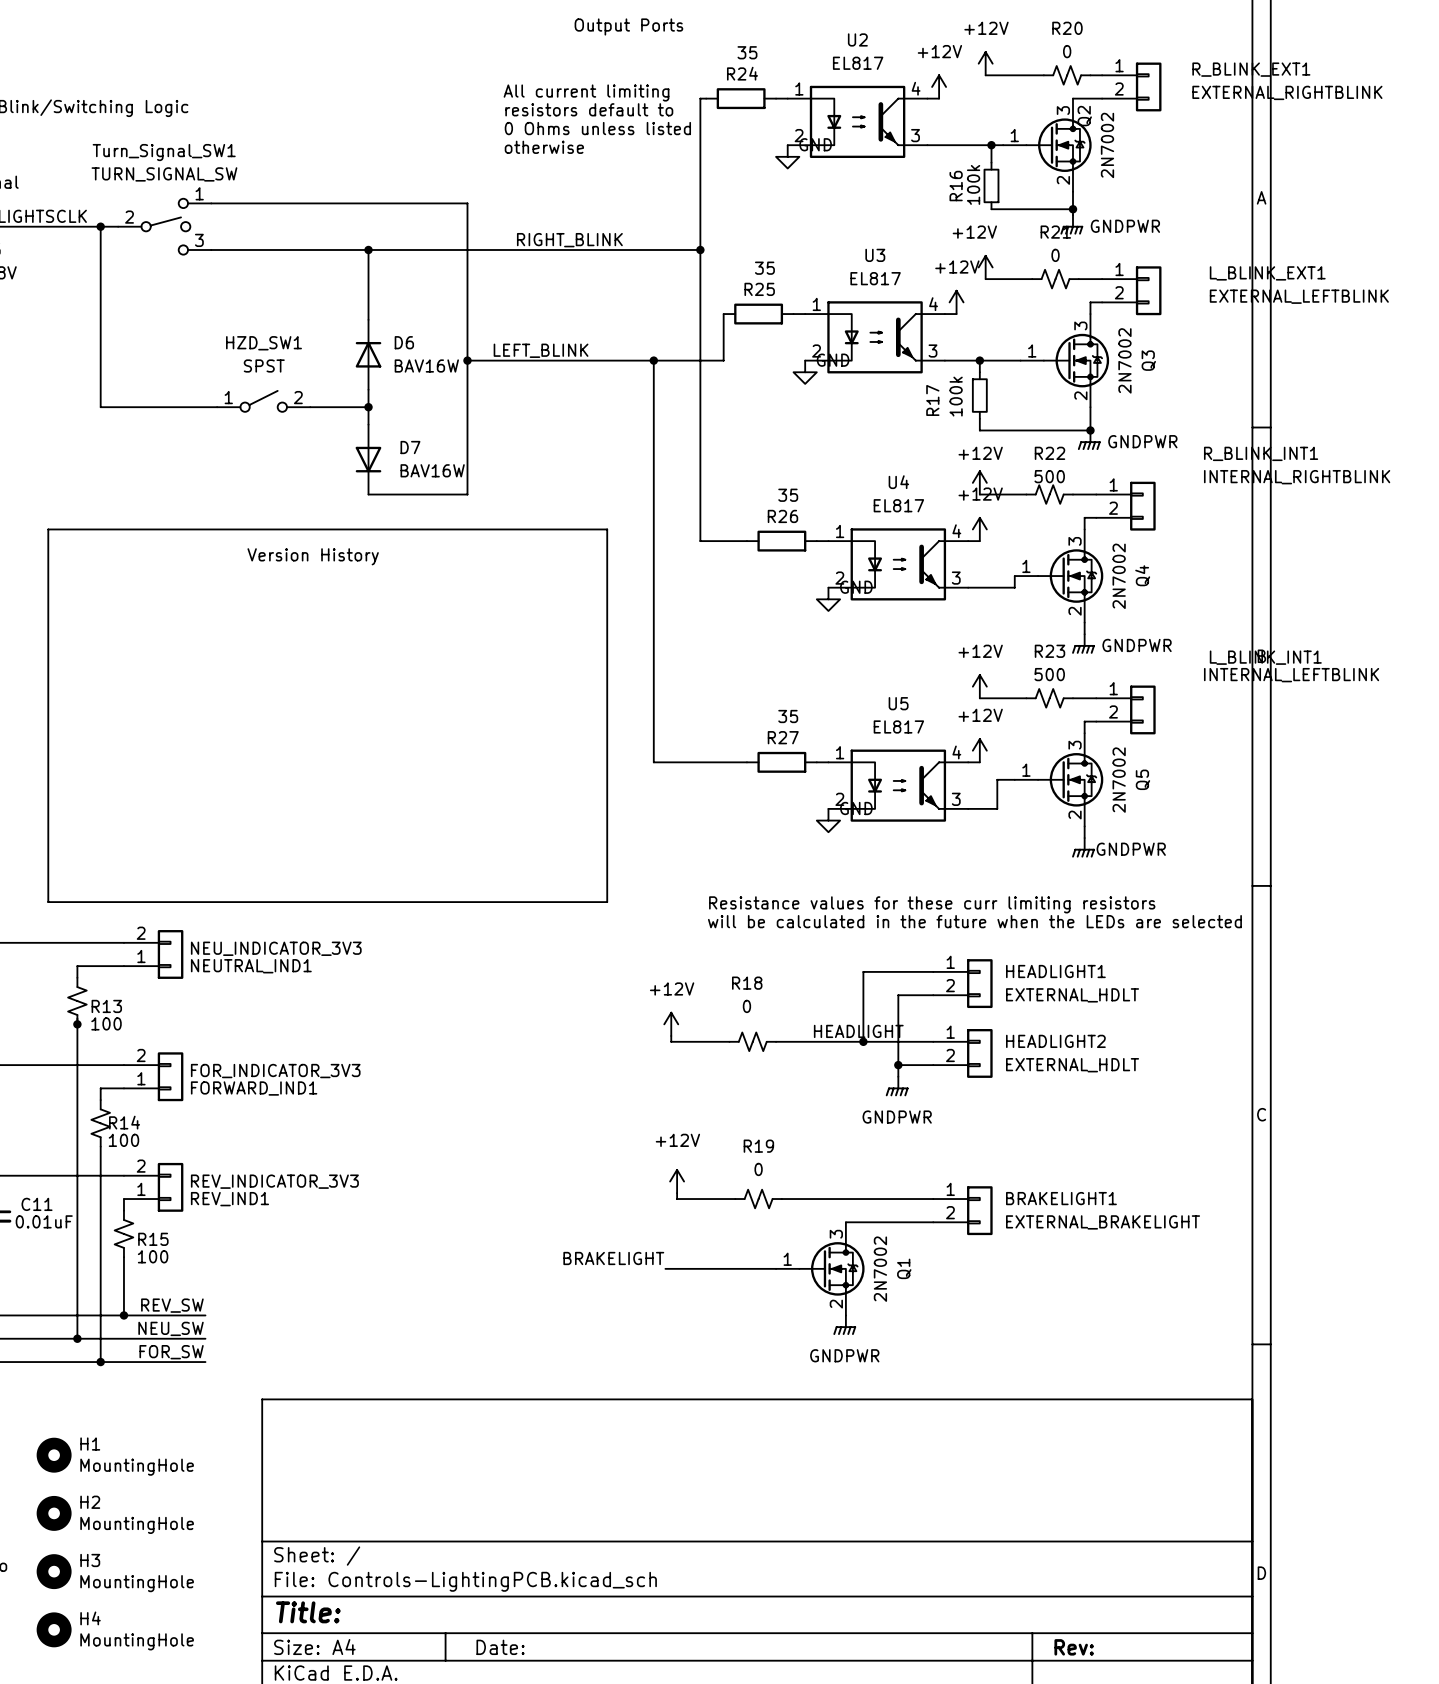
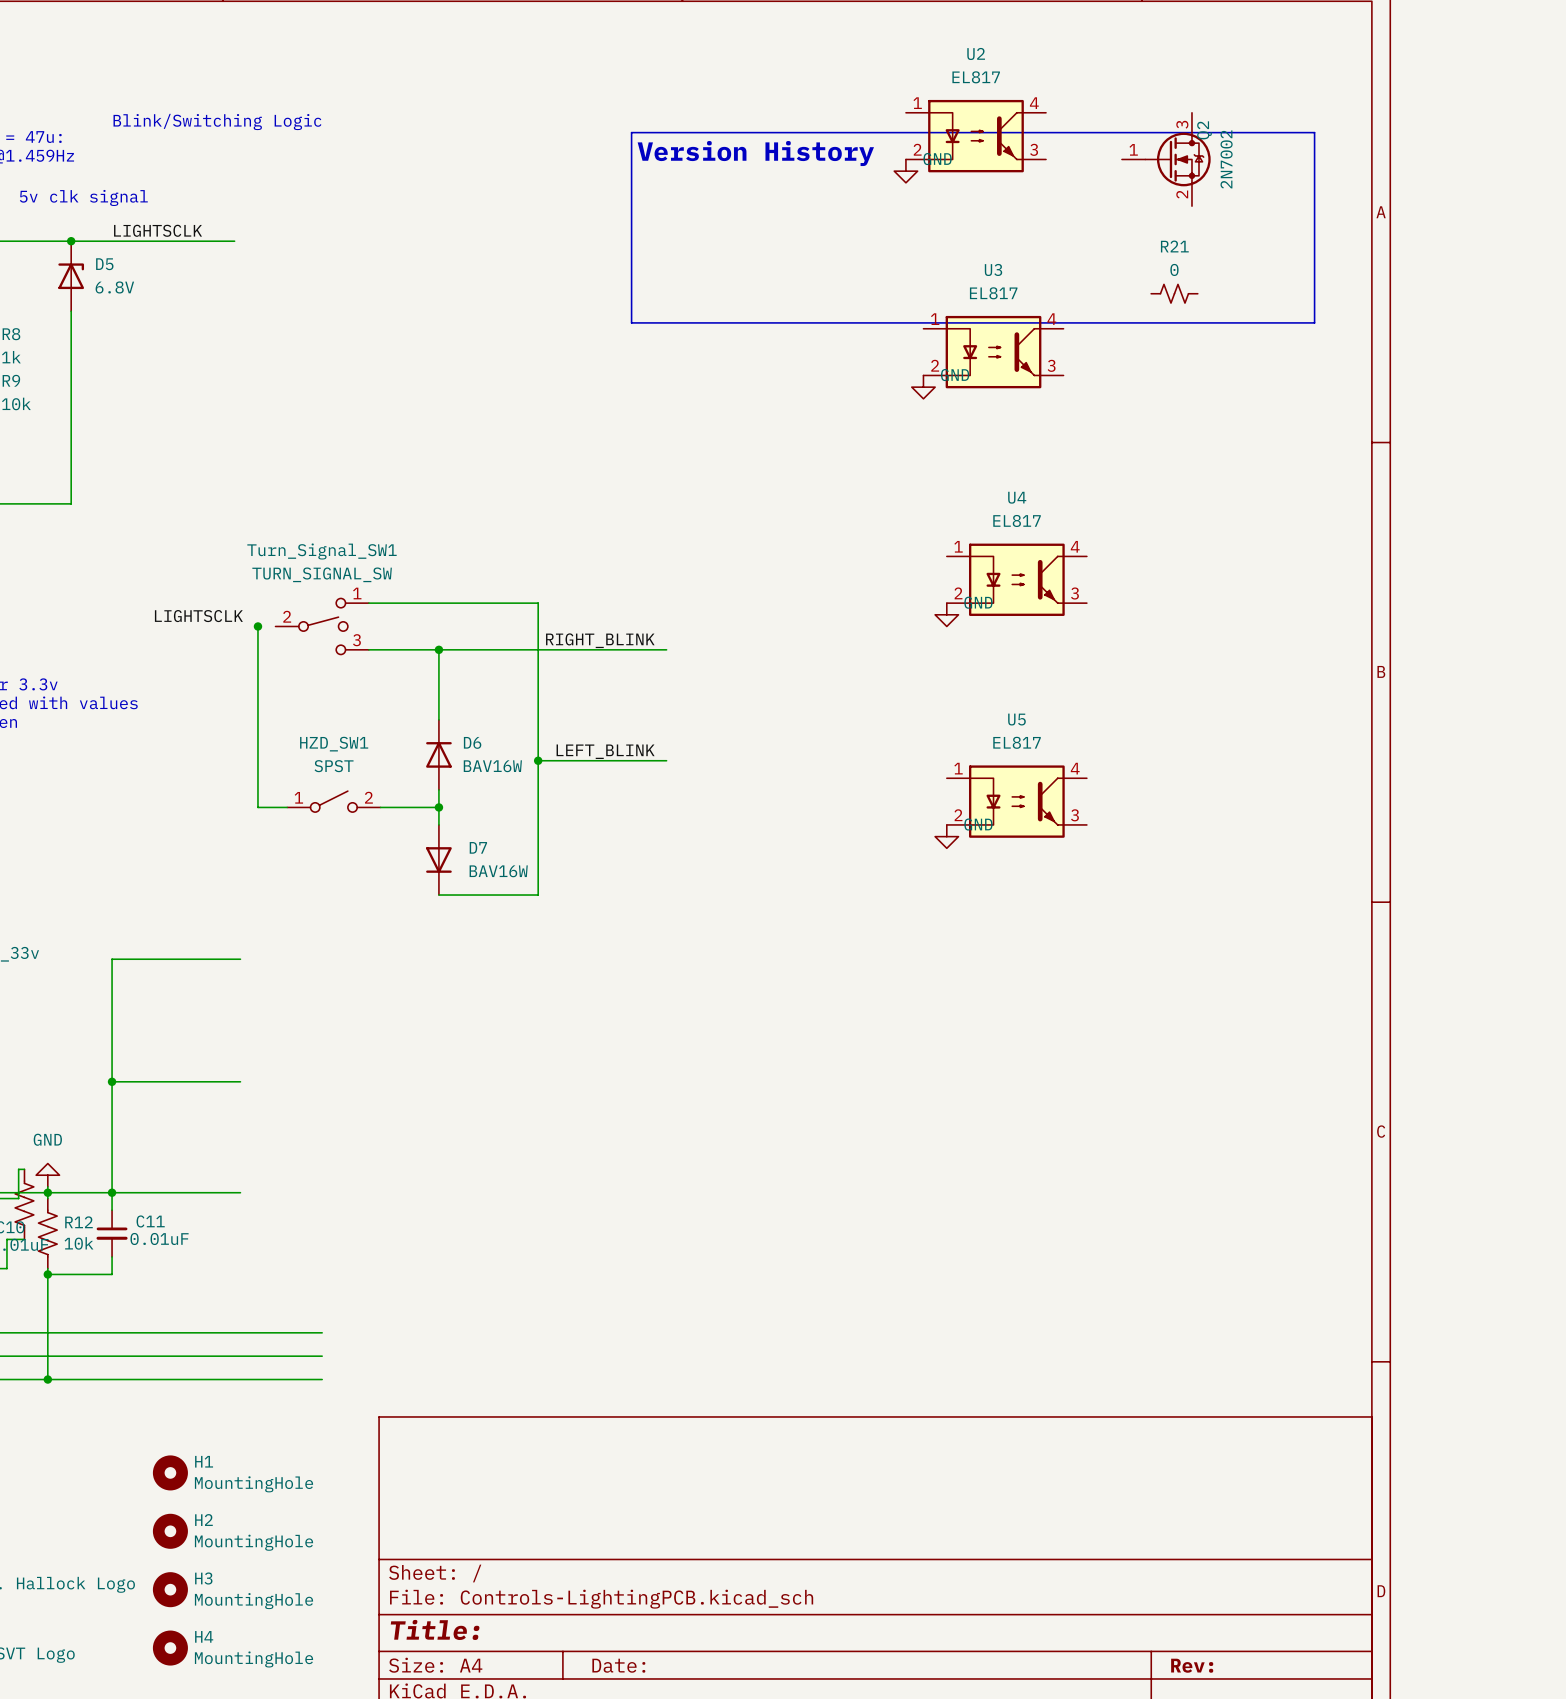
text: Output Ports (628, 26) -> none
power symbol: +12V (985, 63) -> none
wire: (985, 75) (1043, 75) -> none
R20: 0 (1067, 75) -> none
wire: (1090, 75) (1102, 75) -> none
power symbol: +12V (939, 86) -> none
R_BLINK_EXT1: EXTERNAL_RIGHTBLINK (1131, 86) -> none
text: All current limiting (586, 93) -> none
wire: (706, 98) (700, 98) (700, 541) (746, 541) -> none
R24: 35 (741, 98) -> none
wire: (776, 98) (787, 98) -> none
wire: (927, 98) (939, 98) -> none
wire: (1072, 98) (1102, 98) -> none
text: resistors default to (589, 109) -> none
line: none -> (631, 132) (1314, 132) (1314, 322) (631, 322) (631, 132)
text: 0 Ohms unless listed (597, 128) -> none
text: none -> Version History (755, 153)
wire: (927, 145) (1003, 145) -> none
wire: (991, 145) (991, 162) -> none
junction: (991, 145) -> none
text: otherwise (544, 147) -> none
R16: 100k (991, 185) -> none
wire: (1072, 191) (1072, 215) -> none
wire: (211, 203) (467, 203) (467, 494) (368, 494) -> none
wire: (991, 209) (1072, 209) -> none
junction: (1072, 209) -> none
power symbol: GNDPWR (1071, 224) -> none
wire: (100, 226) (100, 407) (217, 407) -> none
junction: (100, 226) -> none
Turn_Signal_SW1 position: (164, 226) -> (322, 626)
label: RIGHT_BLINK (569, 240) -> none
wire: (211, 249) (700, 249) -> none
wire: (368, 249) (368, 319) -> none
junction: (368, 249) -> none
junction: (700, 249) -> none
power symbol: +12V (985, 267) -> none
wire: (985, 279) (1032, 279) -> none
wire: (1078, 279) (1102, 279) -> none
L_BLINK_EXT1: EXTERNAL_LEFTBLINK (1131, 290) -> none
power symbol: +12V (956, 302) -> none
wire: (1102, 302) (1090, 302) (1090, 314) -> none
wire: (723, 314) (723, 360) (467, 360) -> none
R25: 35 (758, 314) -> none
wire: (793, 314) (805, 314) -> none
wire: (944, 314) (956, 314) -> none
label: LEFT_BLINK (541, 350) -> none
D6 position: (368, 354) -> (438, 754)
junction: (467, 360) -> none
wire: (653, 360) (653, 762) (746, 762) -> none
junction: (653, 360) -> none
wire: (944, 360) (1020, 360) -> none
wire: (979, 360) (979, 372) -> none
junction: (979, 360) -> none
Q3: 2N7002 (1064, 360) -> none
wire: (368, 389) (368, 424) -> none
R17: 100k (979, 395) -> none
HZD_SW1 position: (263, 401) -> (333, 801)
wire: (310, 407) (368, 407) -> none
junction: (368, 407) -> none
wire: (1090, 407) (1090, 430) (979, 430) (979, 418) -> none
junction: (1090, 430) -> none
power symbol: GNDPWR (1089, 440) -> none
D7 position: (368, 459) -> (438, 859)
power symbol: +12V (979, 482) -> none
wire: (979, 494) (1026, 494) -> none
R22: 500 (1049, 494) -> none
wire: (1072, 494) (1096, 494) -> none
R_BLINK_INT1: INTERNAL_RIGHTBLINK (1125, 506) -> none
wire: (1096, 517) (1084, 517) (1084, 529) -> none
line: (48, 529) (607, 529) (607, 902) (48, 902) (48, 529) -> none
power symbol: +12V (979, 529) -> none
R26: 35 (781, 541) -> none
wire: (816, 541) (828, 541) -> none
wire: (968, 541) (979, 541) -> none
text: Version History (313, 556) -> none
wire: (1014, 576) (1014, 587) (968, 587) -> none
Q4: 2N7002 (1059, 576) -> none
wire: none -> (368, 603) (538, 603) (538, 895) (438, 895)
label: none -> LIGHTSCLK (198, 616)
wire: none -> (257, 626) (257, 807) (287, 807)
junction: none -> (257, 626)
wire: (1084, 622) (1084, 634) -> none
label: none -> RIGHT_BLINK (600, 640)
wire: none -> (368, 649) (666, 649)
wire: none -> (438, 649) (438, 719)
junction: none -> (438, 649)
power symbol: GNDPWR (1083, 644) -> none
power symbol: +12V (979, 686) -> none
wire: (979, 698) (1026, 698) -> none
R23: 500 (1049, 698) -> none
wire: (1072, 698) (1096, 698) -> none
L_BLINK_INT1: INTERNAL_LEFTBLINK (1125, 709) -> none
wire: (1096, 721) (1084, 721) (1084, 733) -> none
label: none -> LEFT_BLINK (605, 751)
wire: none -> (538, 760) (666, 760)
junction: none -> (538, 760)
power symbol: +12V (979, 750) -> none
R27: 35 (781, 762) -> none
wire: (816, 762) (828, 762) -> none
wire: (968, 762) (979, 762) -> none
wire: none -> (438, 789) (438, 824)
wire: (1014, 779) (997, 779) (997, 808) (968, 808) -> none
Q5: 2N7002 (1059, 779) -> none
wire: none -> (380, 807) (438, 807)
junction: none -> (438, 807)
wire: (1084, 826) (1084, 838) -> none
power symbol: GNDPWR (1083, 847) -> none
text: Resistance values for these curr limiting resistors (932, 904) -> none
text: will be calculated in the future when the LEDs are selected (974, 921) -> none
NEUTRAL_IND1: NEU_INDICATOR_3V3 (153, 954) -> none
wire: (123, 966) (77, 966) (77, 977) -> none
wire: (933, 971) (863, 971) (863, 1041) -> none
HEADLIGHT1: EXTERNAL_HDLT (962, 983) -> none
wire: (933, 995) (898, 995) (898, 1076) -> none
R13: 100 (77, 1001) -> none
wire: (77, 1018) (77, 1338) -> none
junction: (77, 1024) -> none
power symbol: +12V (671, 1024) -> none
label: HEADLIGHT (858, 1031) -> none
wire: (671, 1035) (671, 1041) (729, 1041) -> none
R18: 0 (752, 1041) -> none
wire: (776, 1041) (933, 1041) -> none
junction: (863, 1041) -> none
HEADLIGHT2: EXTERNAL_HDLT (962, 1053) -> none
wire: (898, 1065) (933, 1065) -> none
junction: (898, 1065) -> none
FORWARD_IND1: FOR_INDICATOR_3V3 (153, 1076) -> none
power symbol: GNDPWR (897, 1086) -> none
wire: (123, 1088) (100, 1088) (100, 1100) -> none
R14: 100 (100, 1123) -> none
wire: (100, 1146) (100, 1362) -> none
power symbol: +12V (677, 1181) -> none
REV_IND1: REV_INDICATOR_3V3 (153, 1187) -> none
wire: (677, 1193) (677, 1199) (735, 1199) -> none
wire: (123, 1199) (123, 1210) -> none
R19: 0 (758, 1199) -> none
wire: (781, 1199) (933, 1199) -> none
BRAKELIGHT1: EXTERNAL_BRAKELIGHT (962, 1210) -> none
wire: (845, 1222) (933, 1222) -> none
R15: 100 (123, 1233) -> none
wire: (123, 1257) (123, 1315) -> none
label: BRAKELIGHT (613, 1258) -> none
wire: (665, 1268) (776, 1268) -> none
Q1: 2N7002 (820, 1268) -> none
label: REV_SW (172, 1305) -> none
junction: (123, 1315) -> none
power symbol: GNDPWR (844, 1325) -> none
label: NEU_SW (171, 1328) -> none
junction: (77, 1338) -> none
label: FOR_SW (171, 1352) -> none
junction: (100, 1362) -> none

